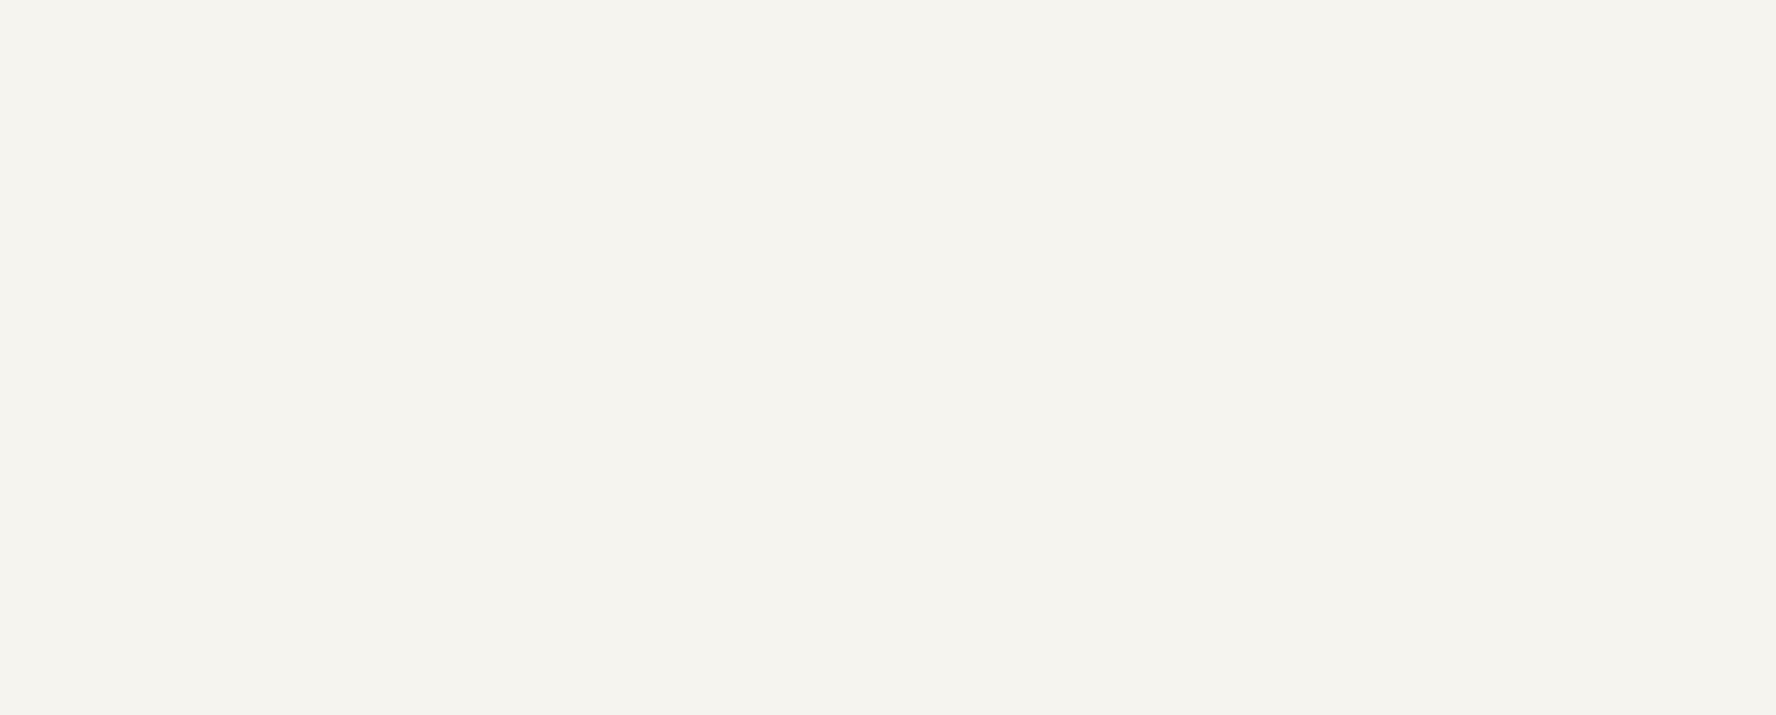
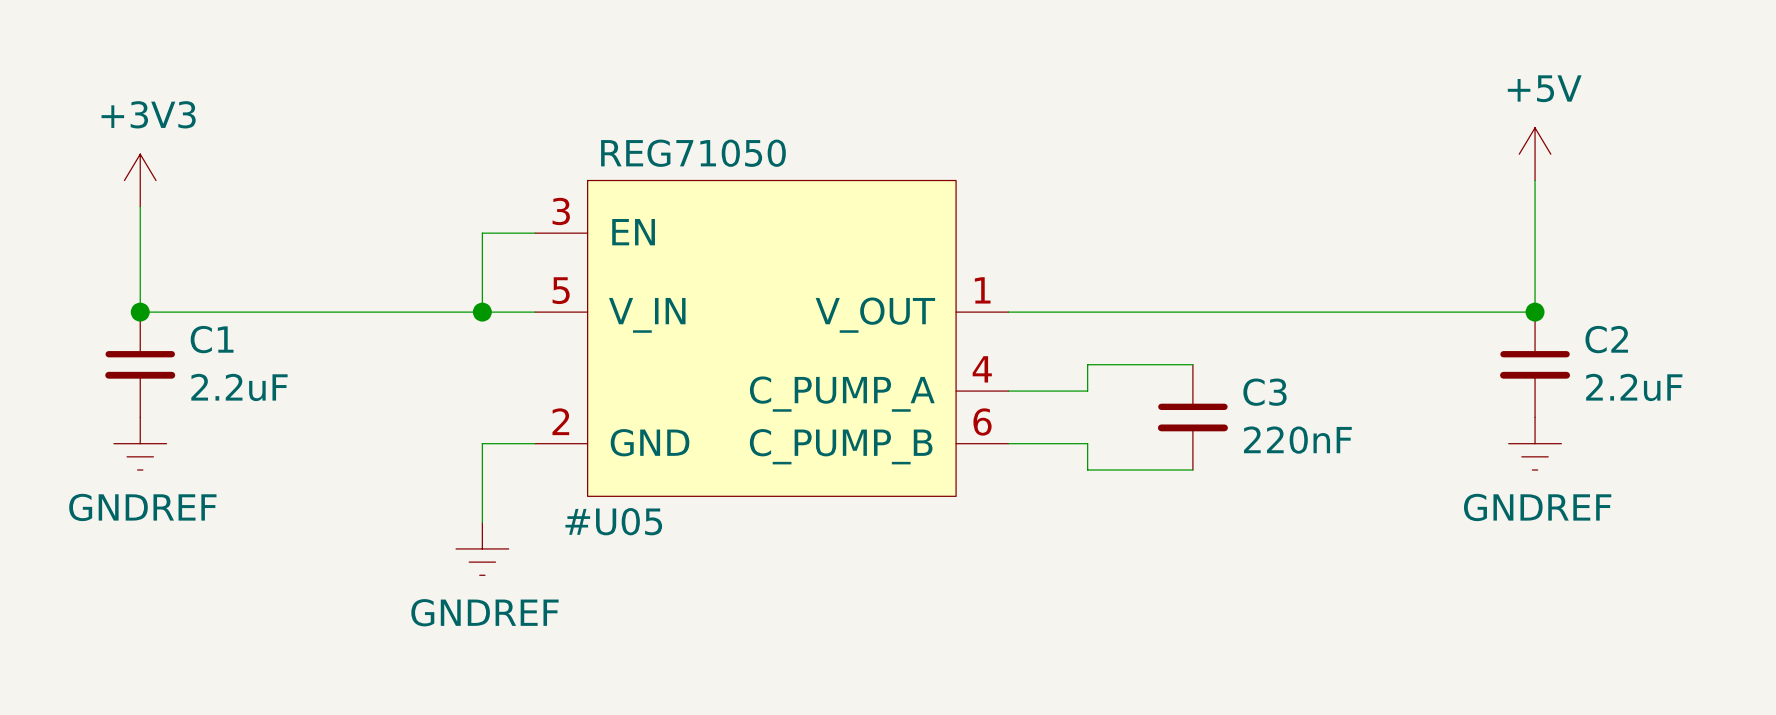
power symbol: none -> +5V (1535, 154)
power symbol: none -> +3V3 (140, 180)
wire: none -> (1535, 180) (1535, 312) (1008, 312)
wire: none -> (140, 206) (140, 312) (534, 312)
wire: none -> (534, 233) (482, 233) (482, 312)
junction: none -> (140, 312)
junction: none -> (482, 312)
junction: none -> (1535, 312)
#U05: none -> REG71050 (771, 338)
C1: none -> 2.2uF (140, 364)
wire: none -> (1192, 364) (1087, 364) (1087, 391) (1008, 391)
C2: none -> 2.2uF (1535, 364)
C3: none -> 220nF (1192, 417)
power symbol: none -> GNDREF (140, 443)
wire: none -> (534, 443) (482, 443) (482, 522)
wire: none -> (1008, 443) (1087, 443) (1087, 470) (1192, 470)
power symbol: none -> GNDREF (1535, 443)
power symbol: none -> GNDREF (482, 548)

